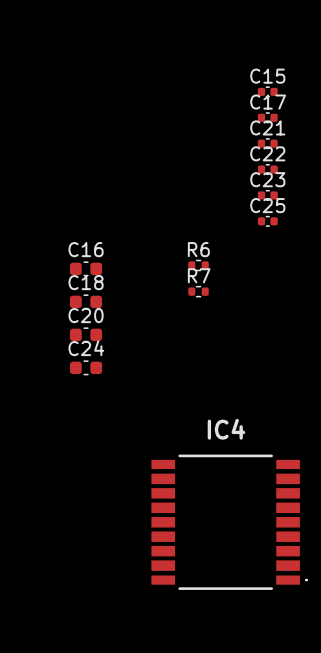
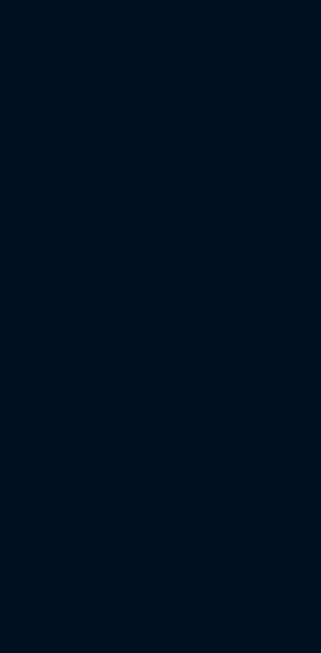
C15: (267, 91) -> none
C17: (267, 117) -> none
C21: (267, 143) -> none
C22: (267, 169) -> none
C23: (267, 195) -> none
C25: (267, 221) -> none
R6: (198, 265) -> none
C16: (86, 268) -> none
R7: (198, 291) -> none
C18: (86, 301) -> none
C20: (86, 334) -> none
C24: (86, 367) -> none
IC4: (229, 522) -> none

